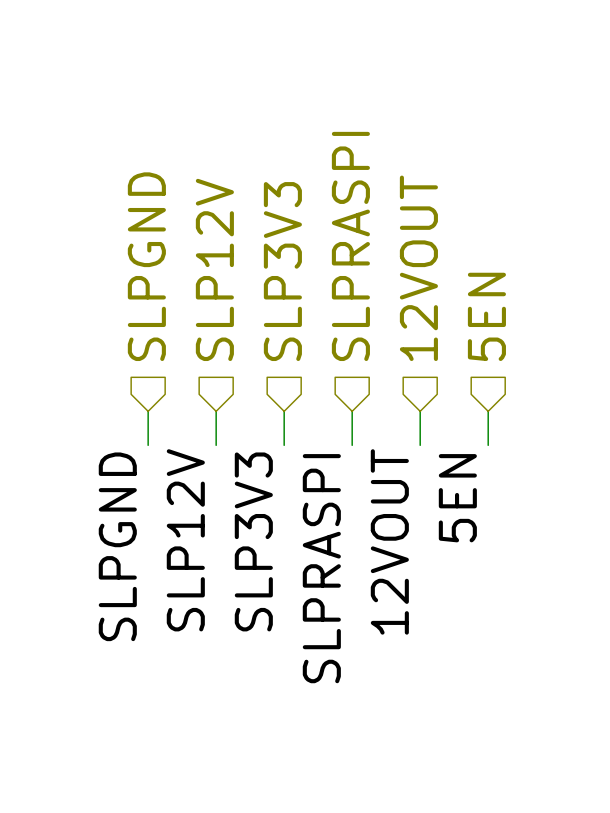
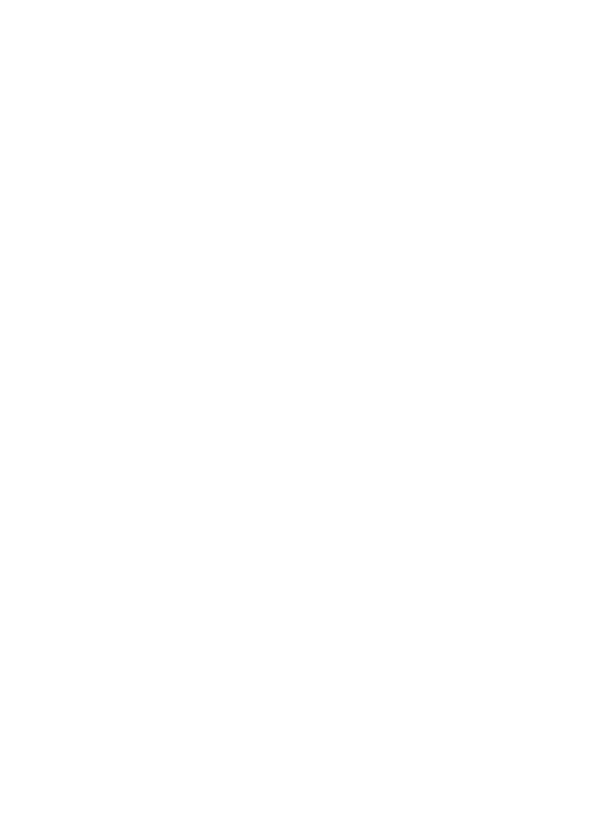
hierarchical label: SLPRASPI (350, 246) -> none
hierarchical label: SLPGND (146, 266) -> none
hierarchical label: 12VOUT (418, 268) -> none
hierarchical label: SLP12V (214, 269) -> none
hierarchical label: SLP3V3 (282, 271) -> none
hierarchical label: 5EN (486, 316) -> none
wire: (148, 411) (148, 445) -> none
wire: (216, 411) (216, 445) -> none
wire: (284, 411) (284, 445) -> none
wire: (352, 411) (352, 445) -> none
wire: (420, 411) (420, 445) -> none
wire: (488, 411) (488, 445) -> none
label: 5EN (457, 498) -> none
label: SLP12V (185, 540) -> none
label: SLP3V3 (253, 541) -> none
label: 12VOUT (389, 541) -> none
label: SLPGND (117, 546) -> none
label: SLPRASPI (321, 568) -> none

